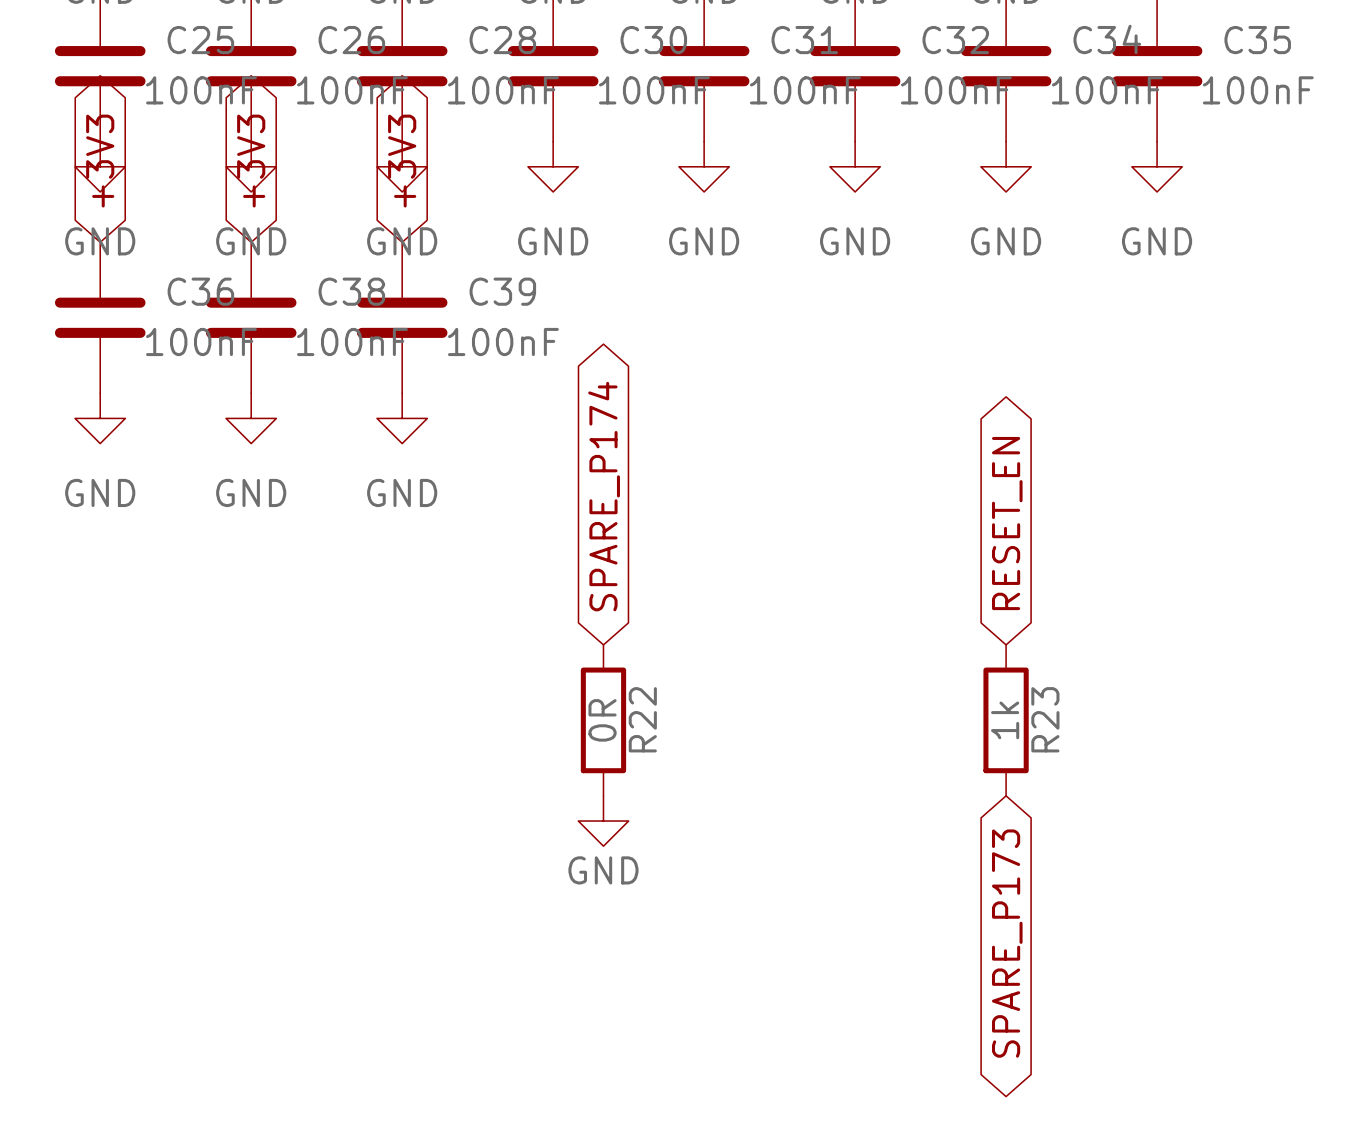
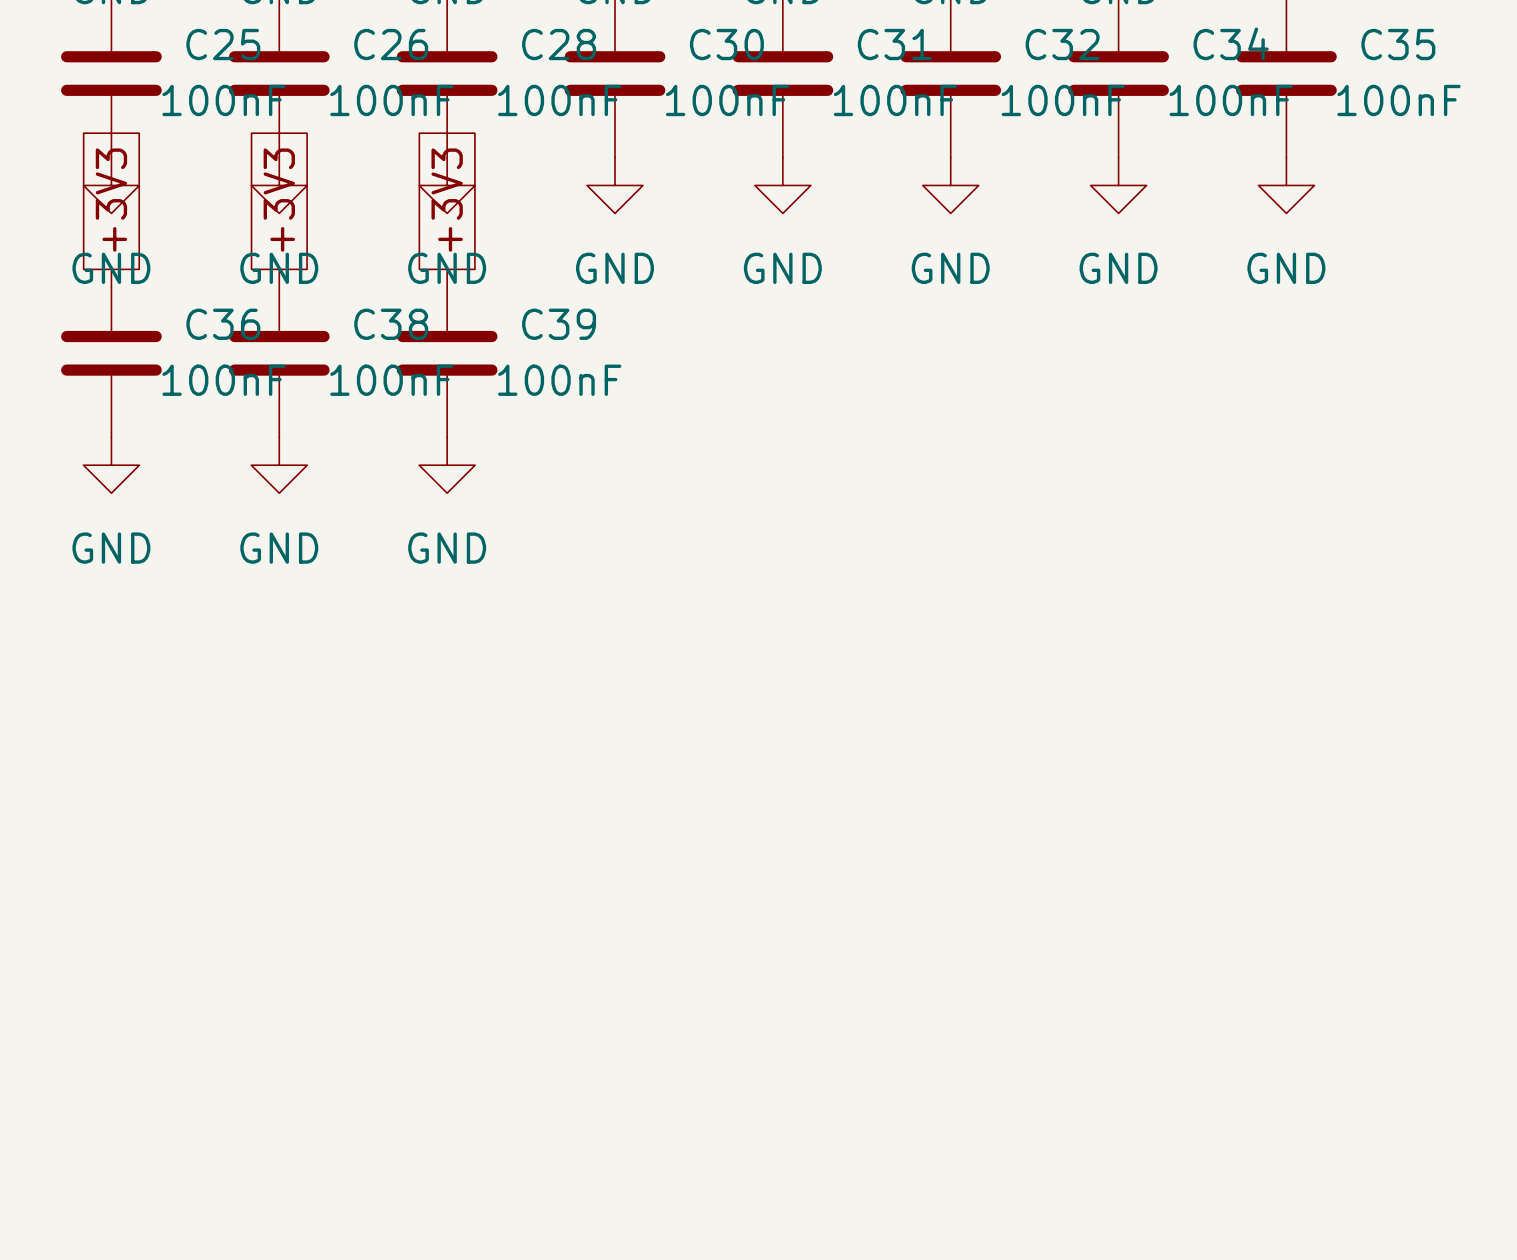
global label shape: bidirectional (100, 161) -> passive (111, 200)
global label shape: bidirectional (251, 161) -> passive (279, 200)
global label shape: bidirectional (402, 161) -> passive (447, 200)
global label: SPARE_P174 (604, 496) -> none
global label: RESET_EN (1007, 523) -> none
R22: 0R (603, 720) -> none
R23: 1k (1006, 720) -> none
power symbol: GND (603, 821) -> none
global label: SPARE_P173 (1007, 943) -> none

